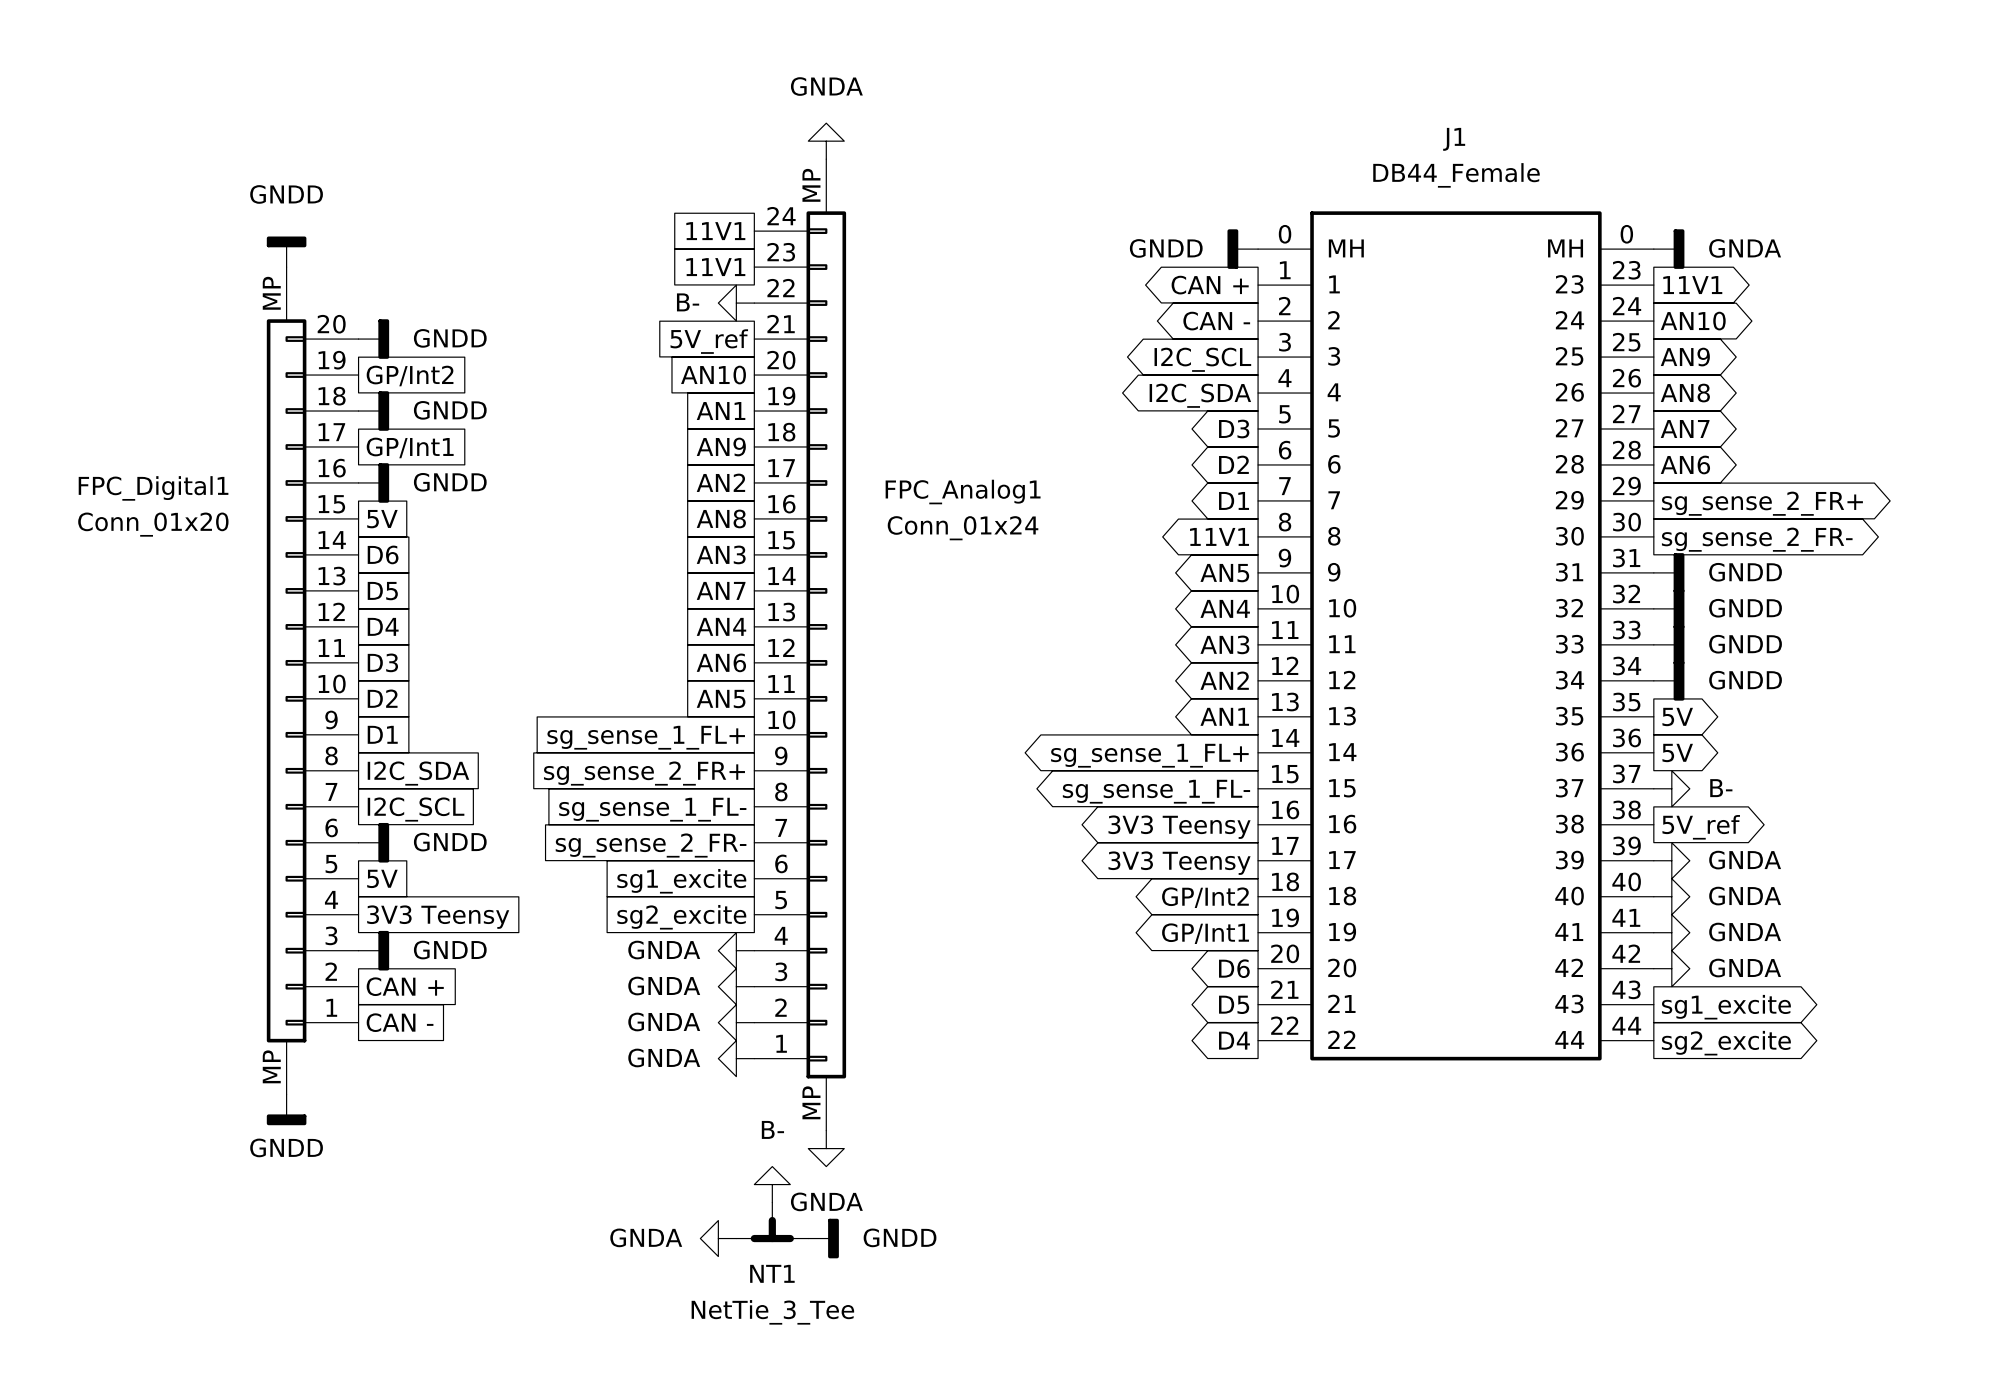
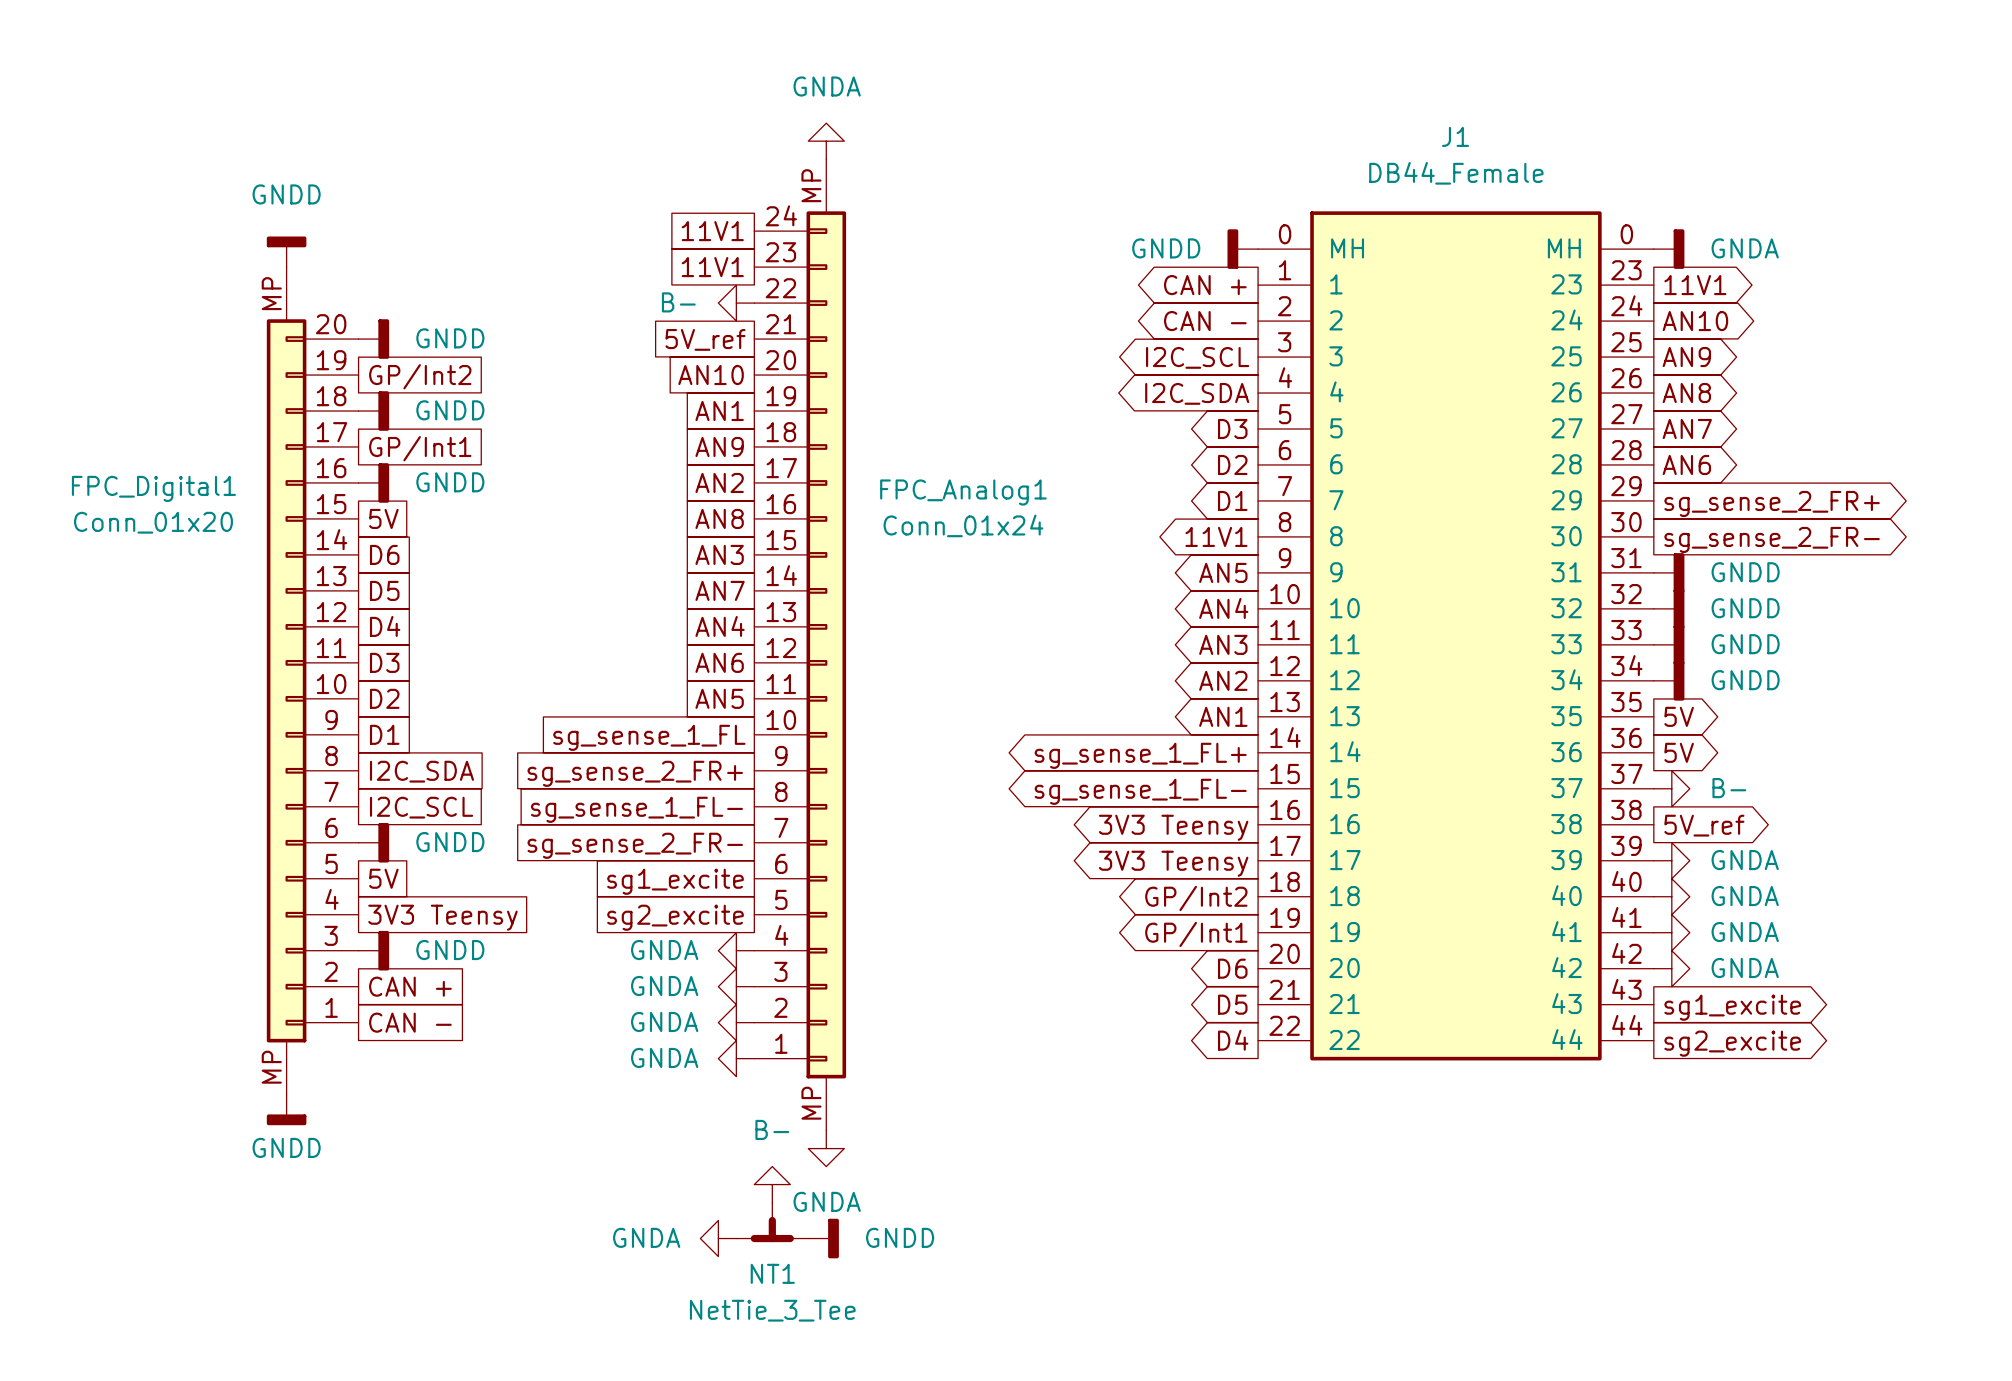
global label: sg_sense_1_FL+ (646, 737) -> sg_sense_1_FL (649, 737)

